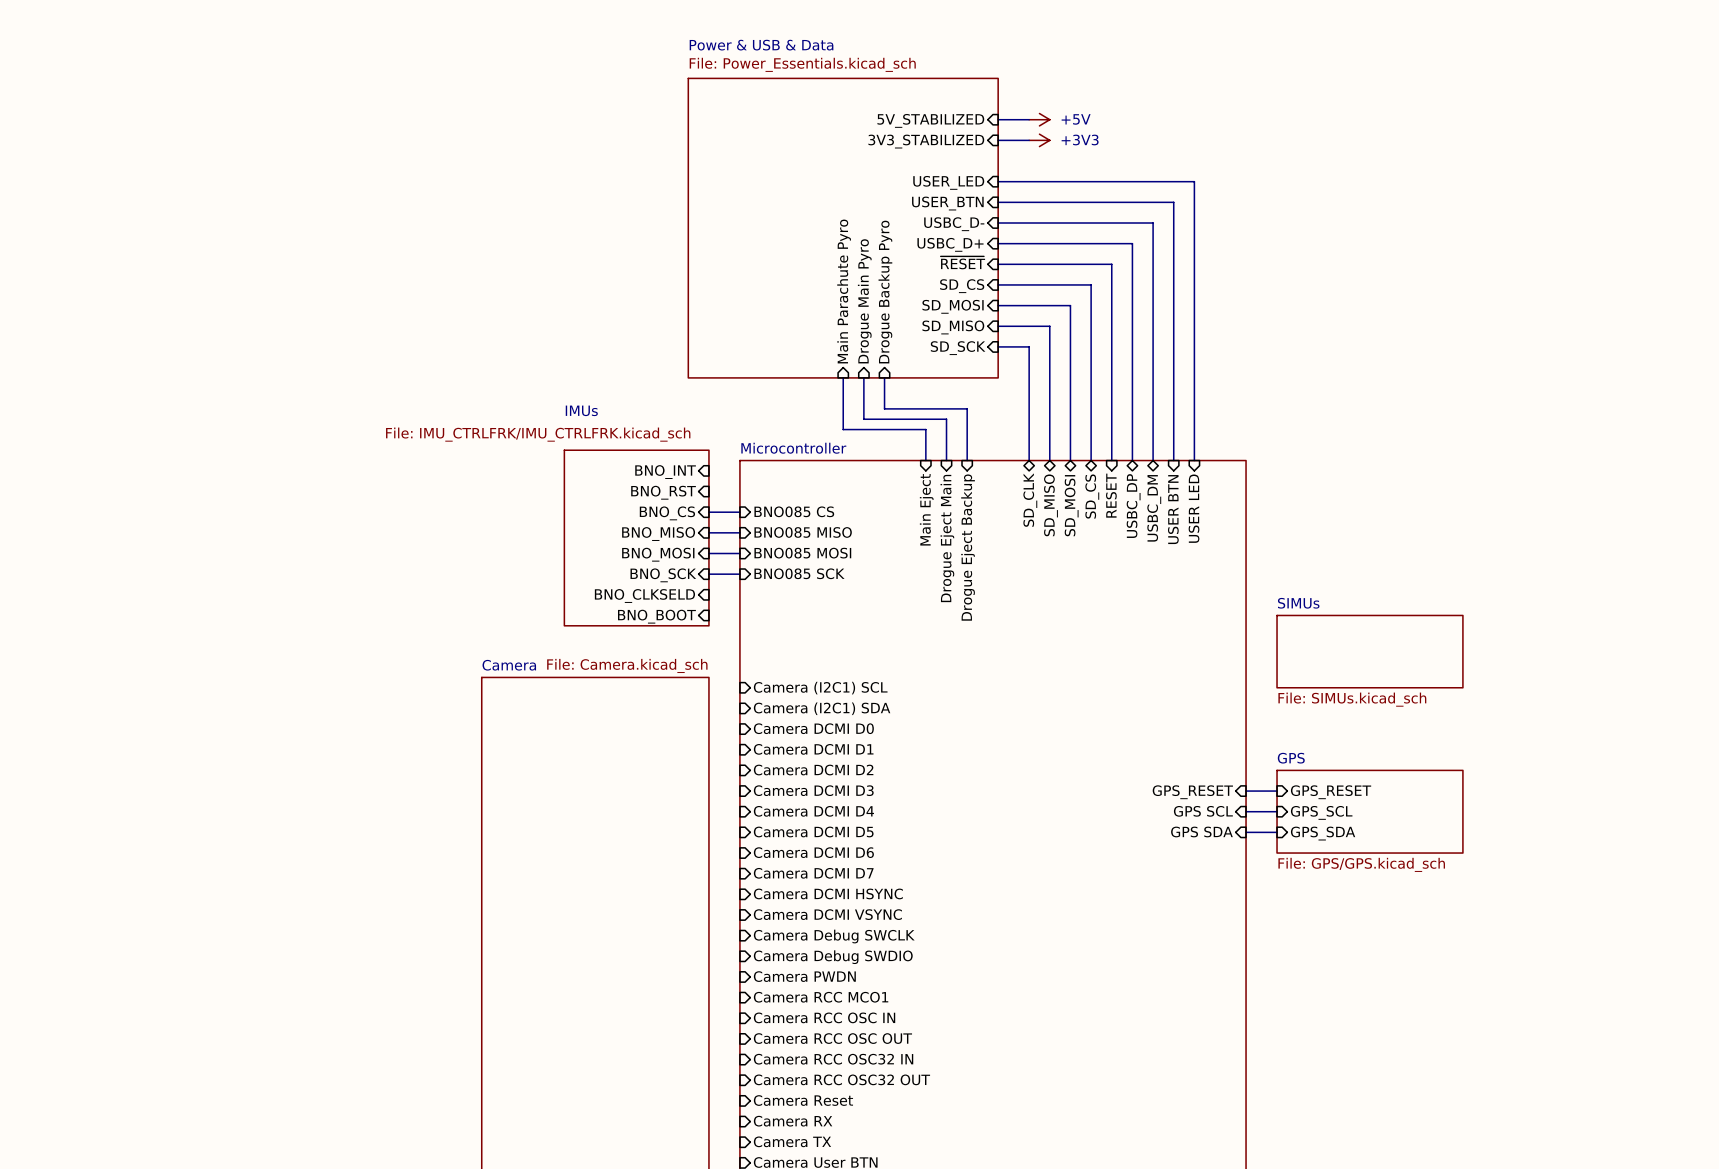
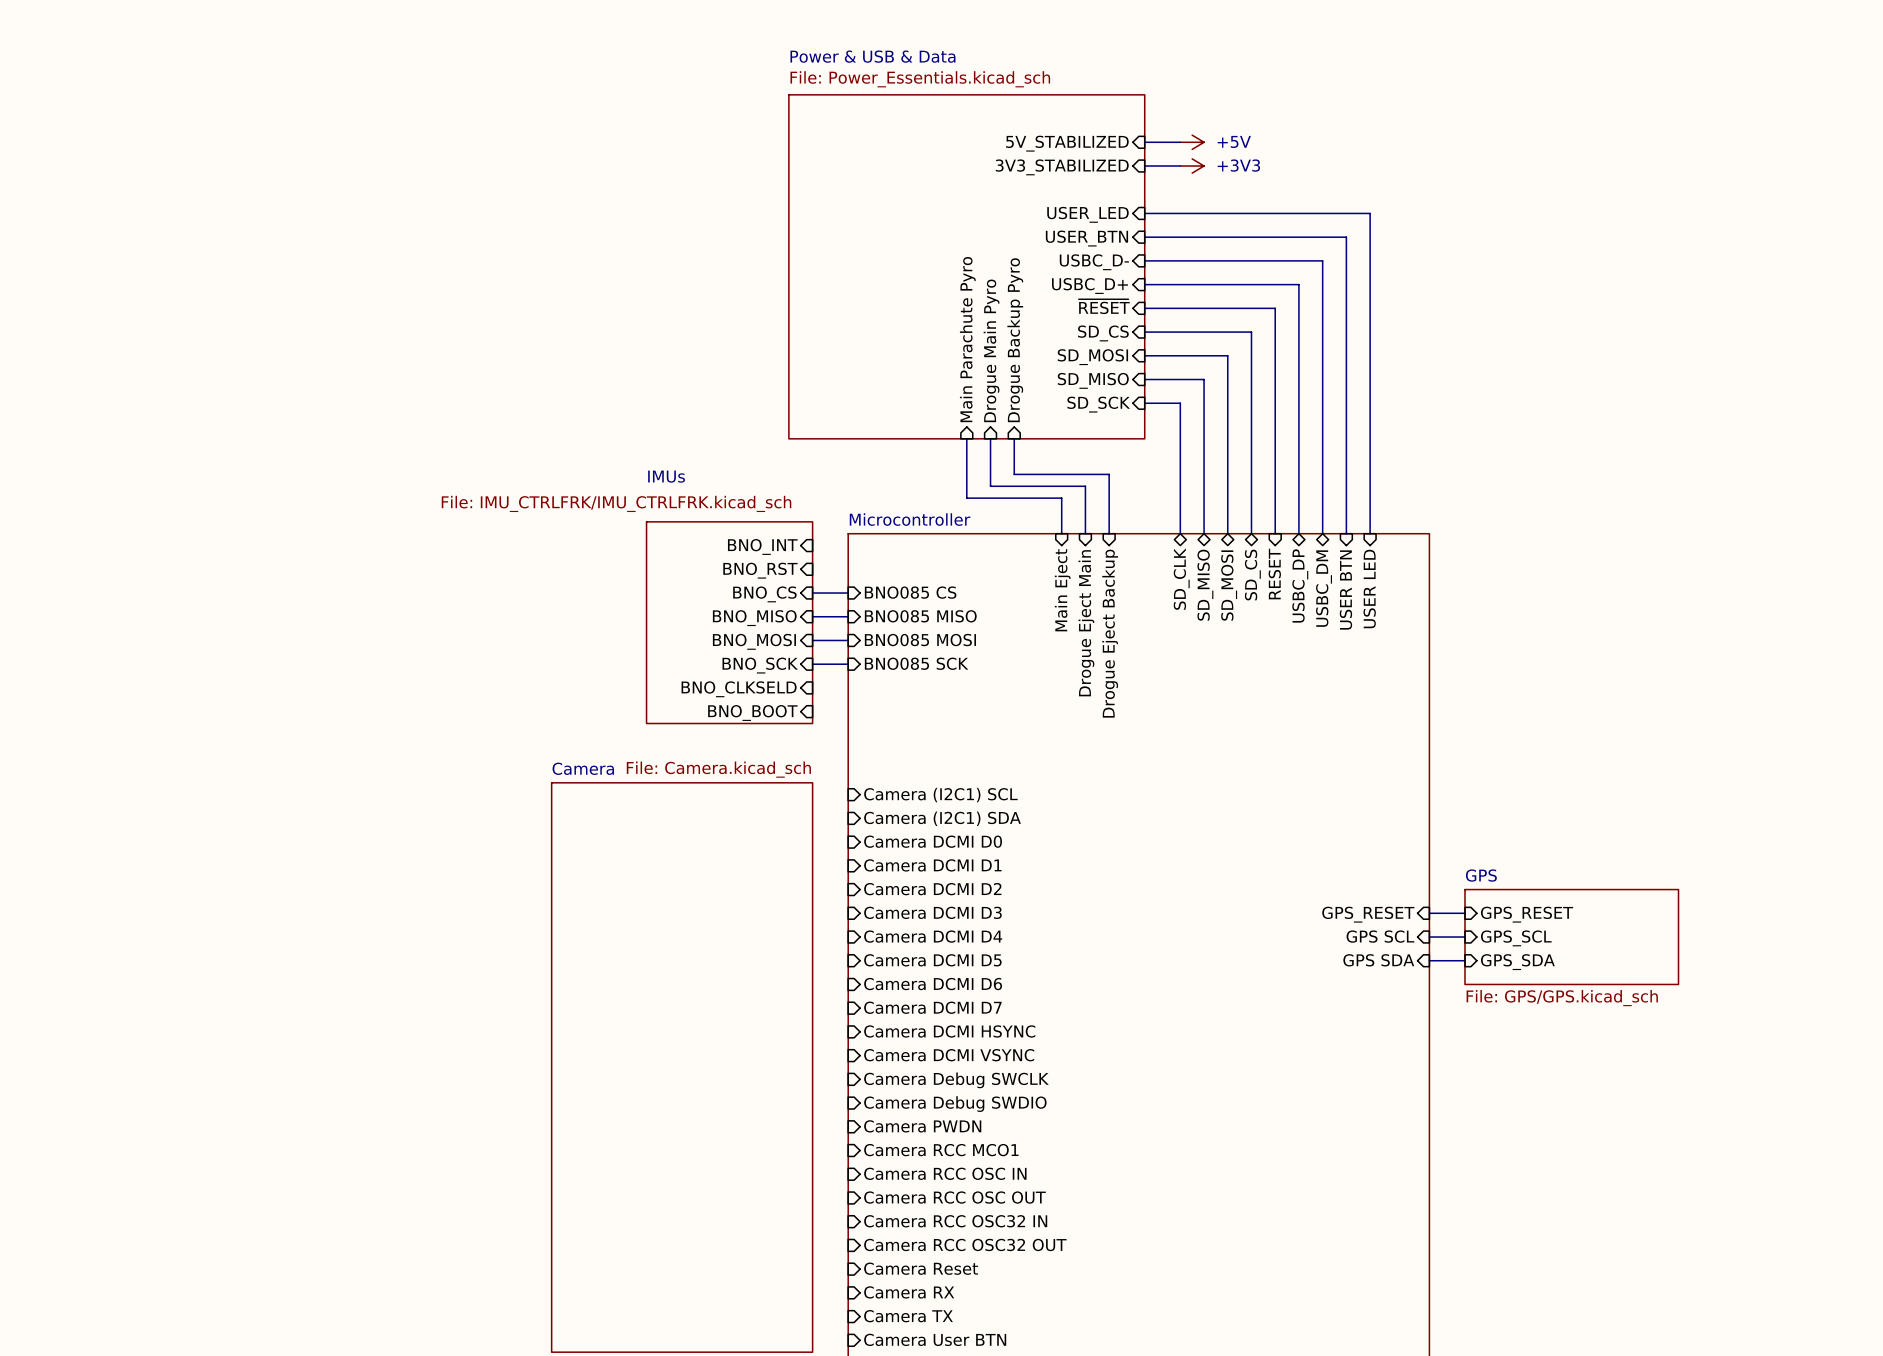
sheet SIMUs: File: SIMUs.kicad_sch (1369, 651) -> none

